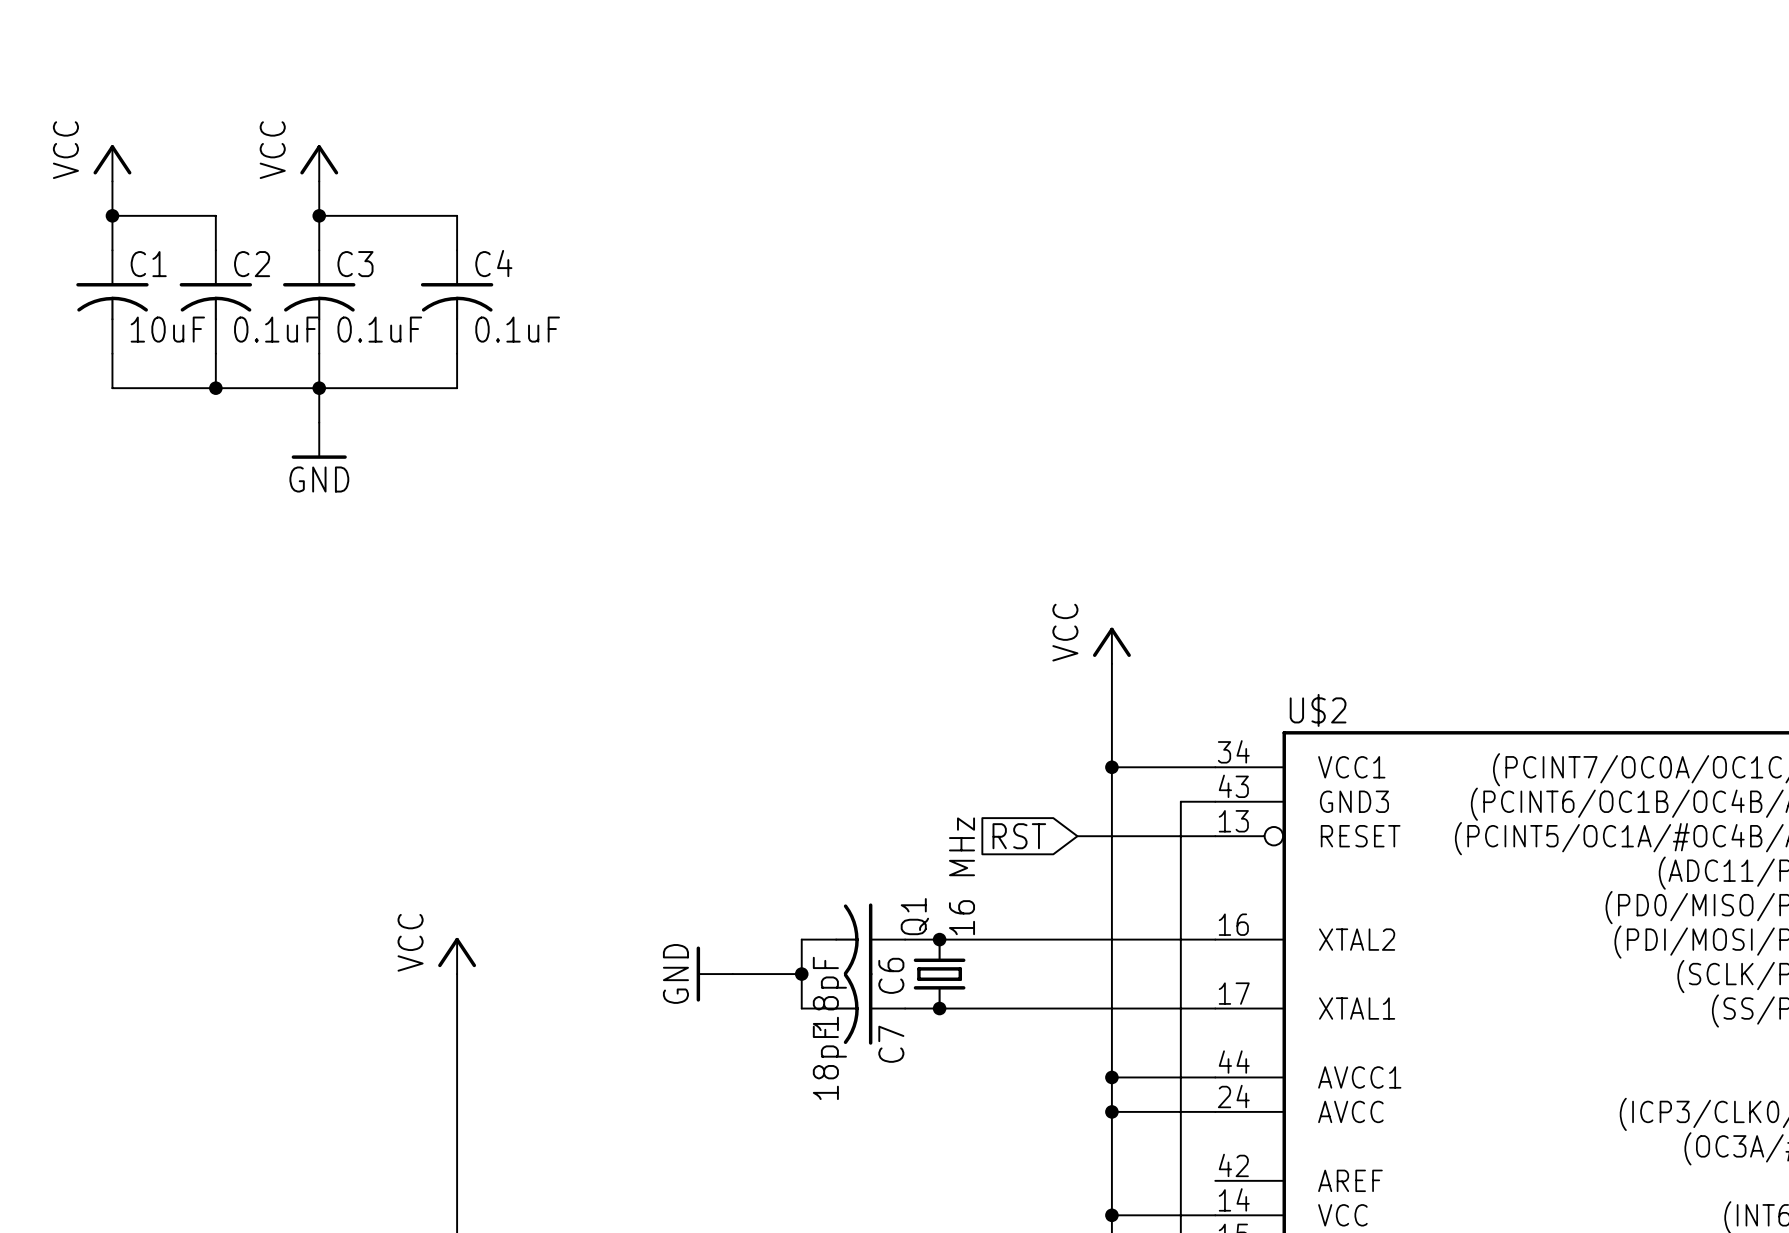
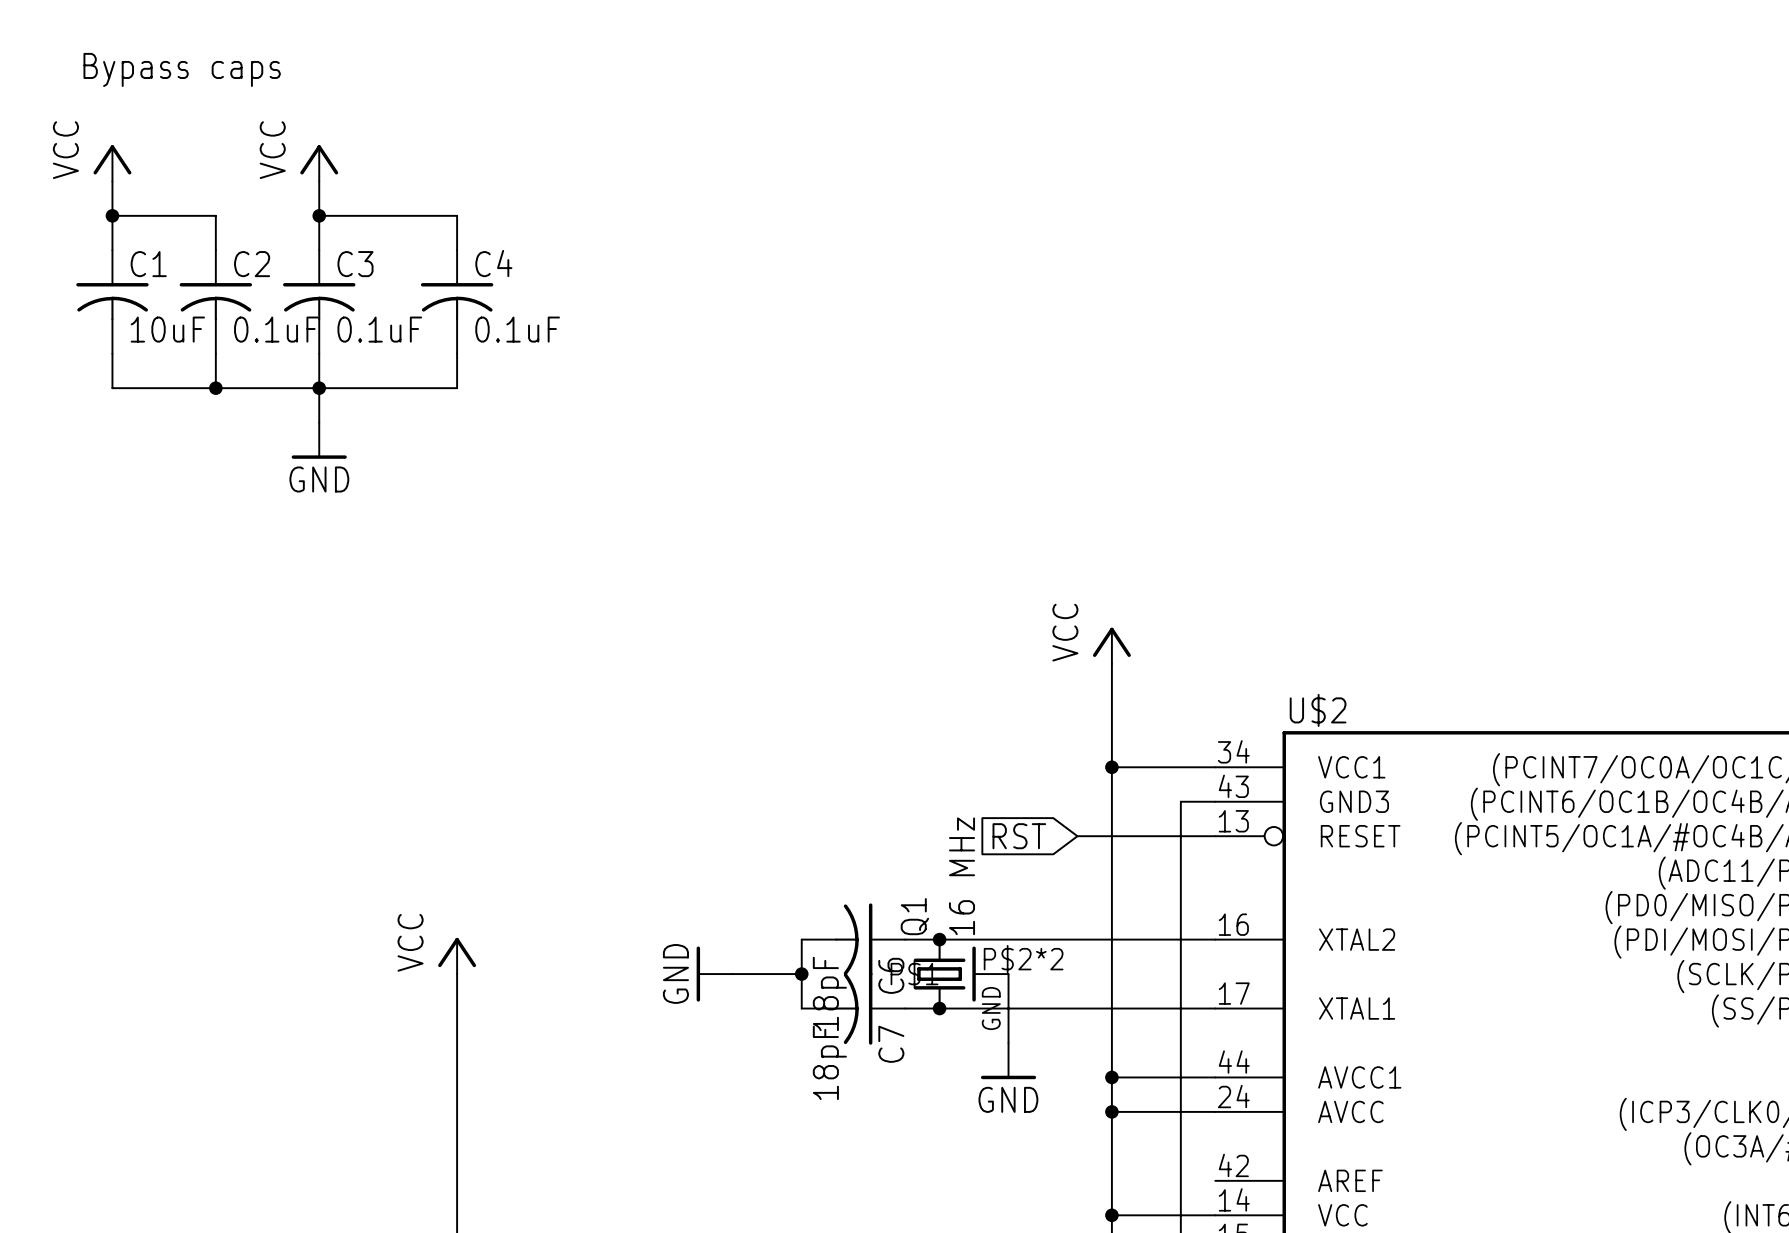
text: none -> Bypass caps (182, 69)
Q1 symbol: [913, 938, 966, 1010] -> [913, 938, 1009, 1010]
wire: none -> (1008, 974) (1008, 1042)
power symbol: none -> GND (1008, 1061)

